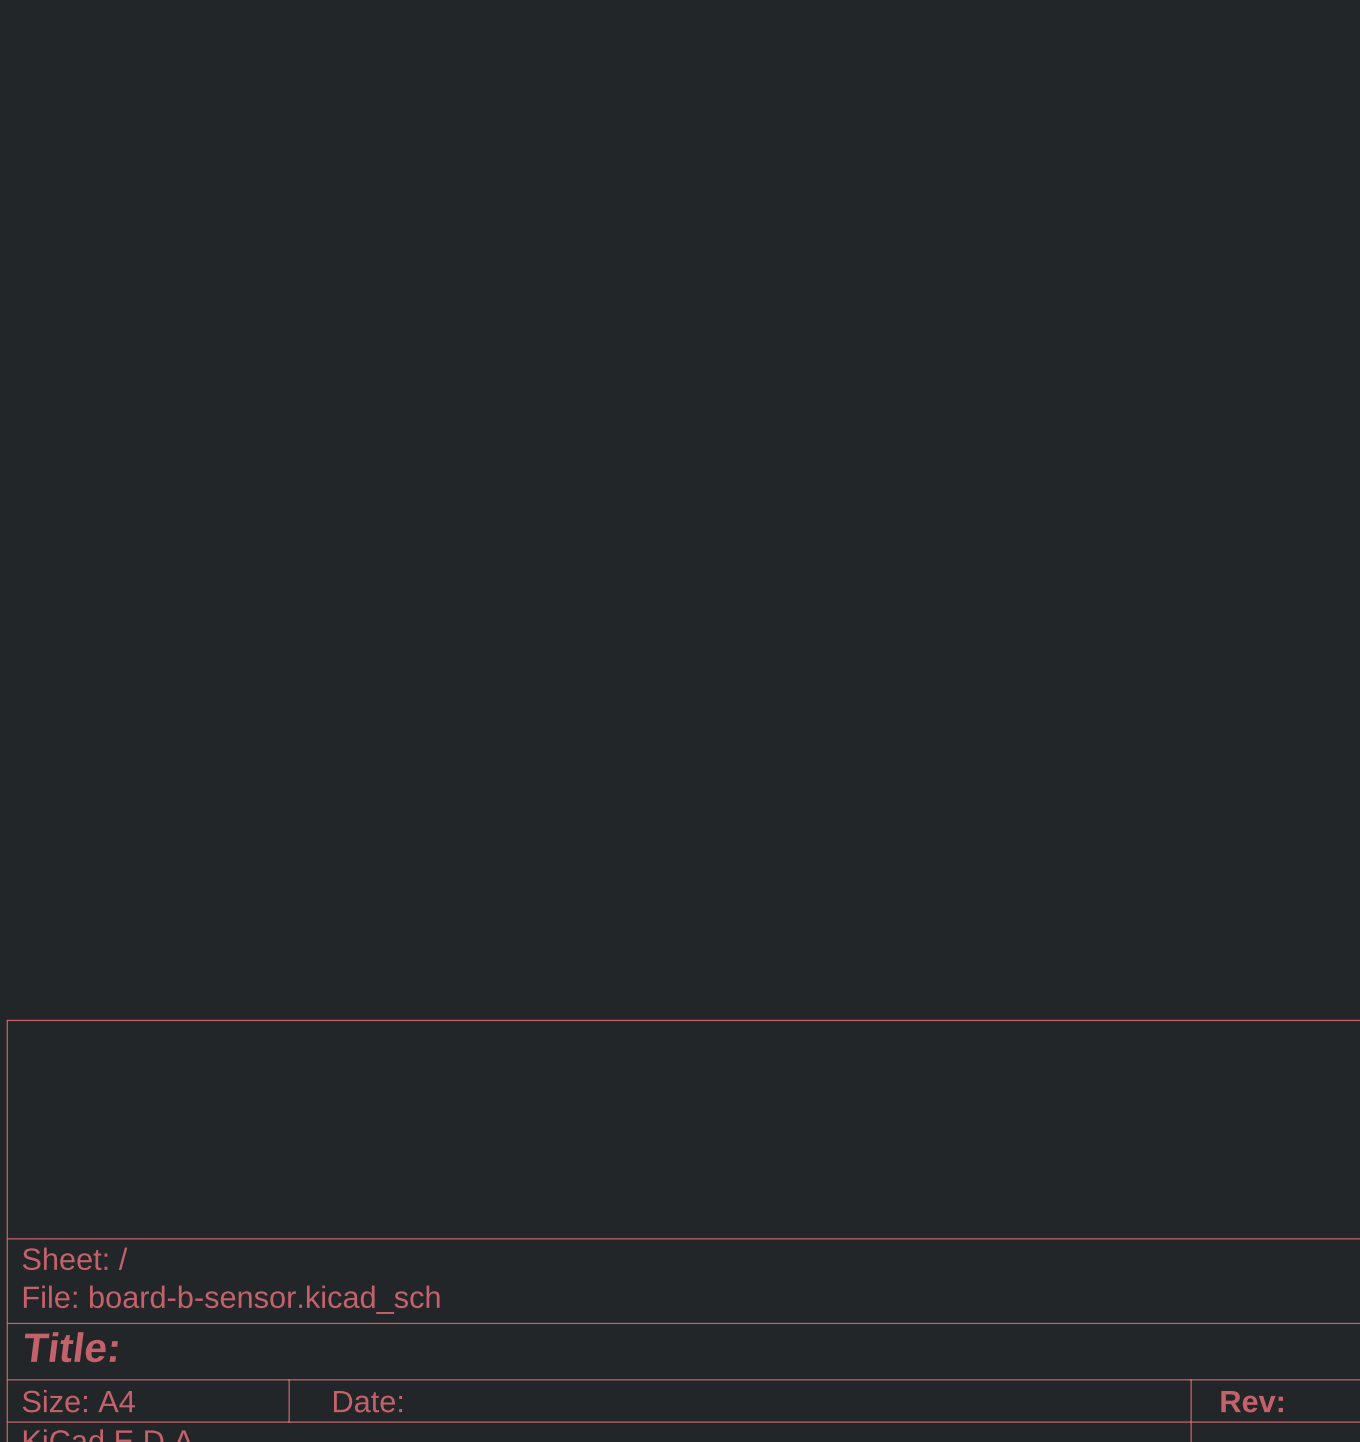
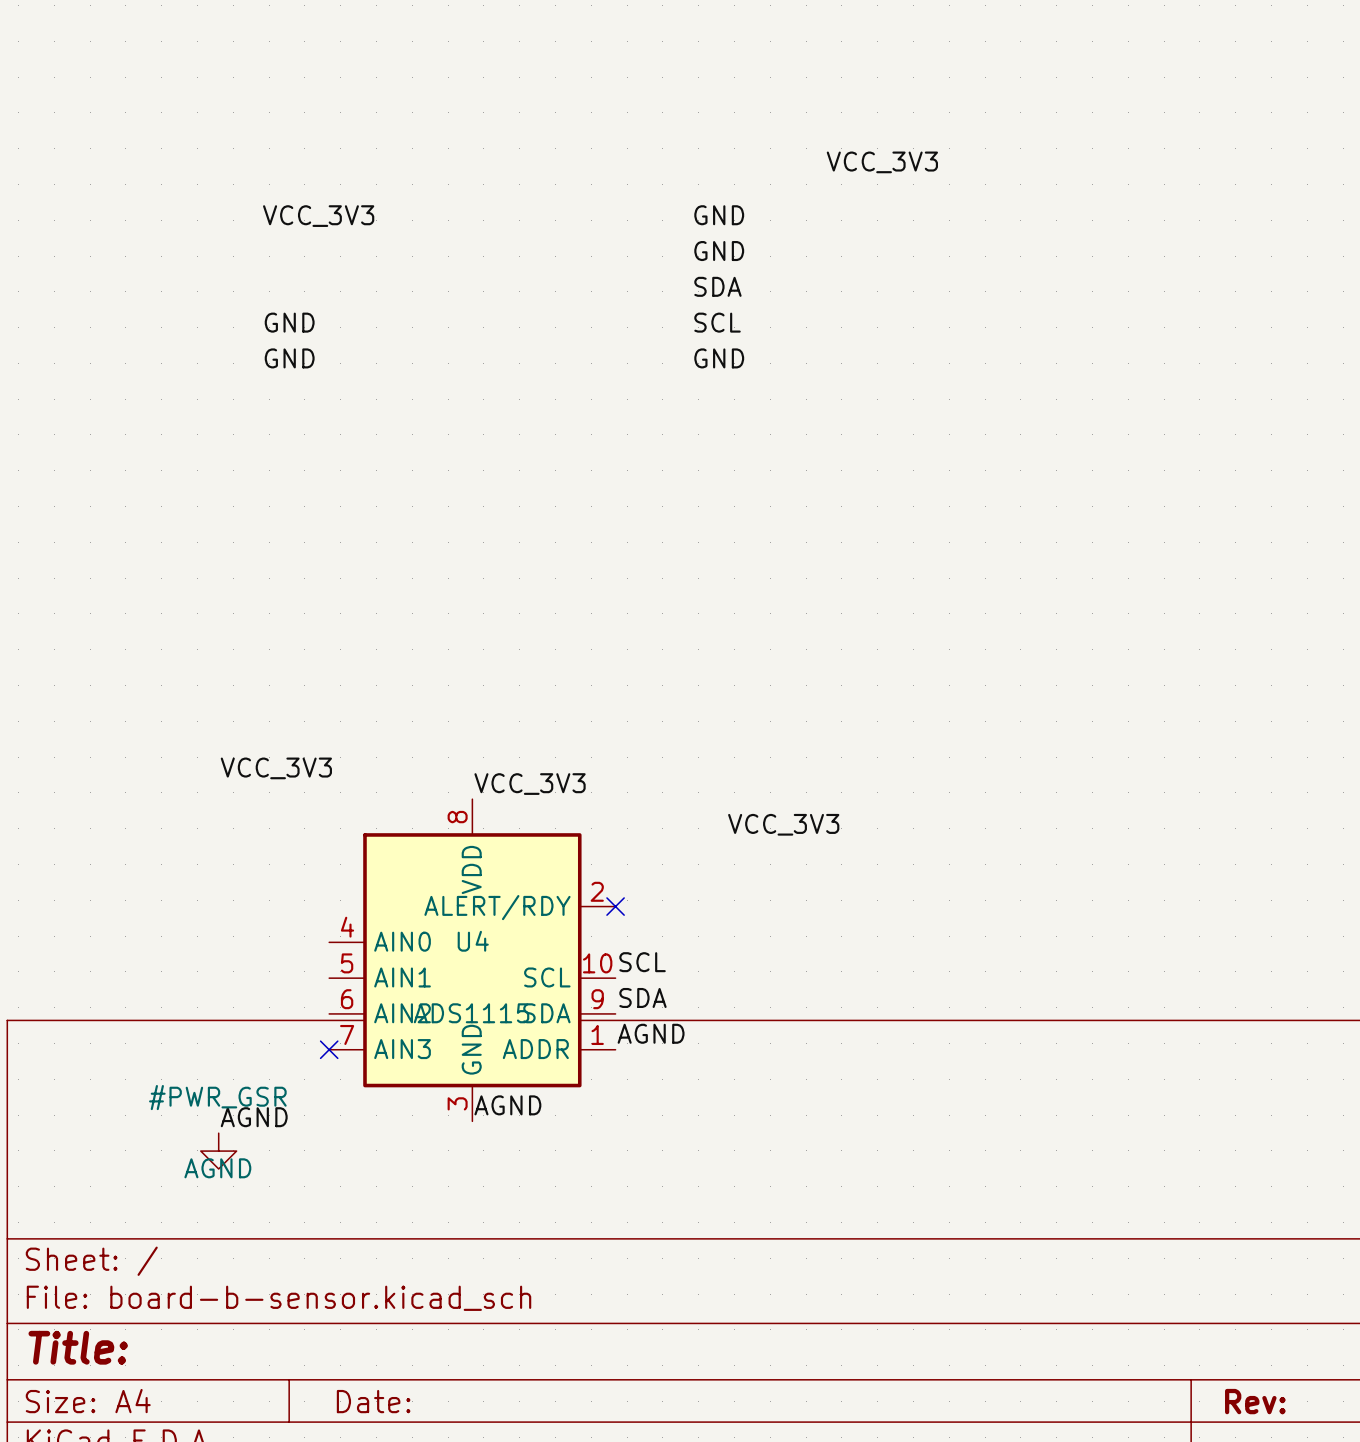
label: none -> VCC_3V3 (882, 162)
label: none -> GND (719, 215)
label: none -> VCC_3V3 (318, 216)
label: none -> GND (719, 251)
label: none -> SDA (717, 286)
label: none -> GND (289, 322)
label: none -> SCL (717, 322)
label: none -> GND (289, 358)
label: none -> GND (719, 358)
label: none -> VCC_3V3 (276, 768)
label: none -> VCC_3V3 (530, 784)
label: none -> VCC_3V3 (783, 824)
no-connect mark: none -> (615, 906)
U4: none -> ADS1115 (472, 960)
label: none -> SCL (642, 962)
label: none -> SDA (642, 997)
label: none -> AGND (651, 1033)
no-connect mark: none -> (329, 1049)
label: none -> AGND (507, 1105)
label: none -> AGND (254, 1117)
#PWR_GSR: none -> AGND (218, 1151)

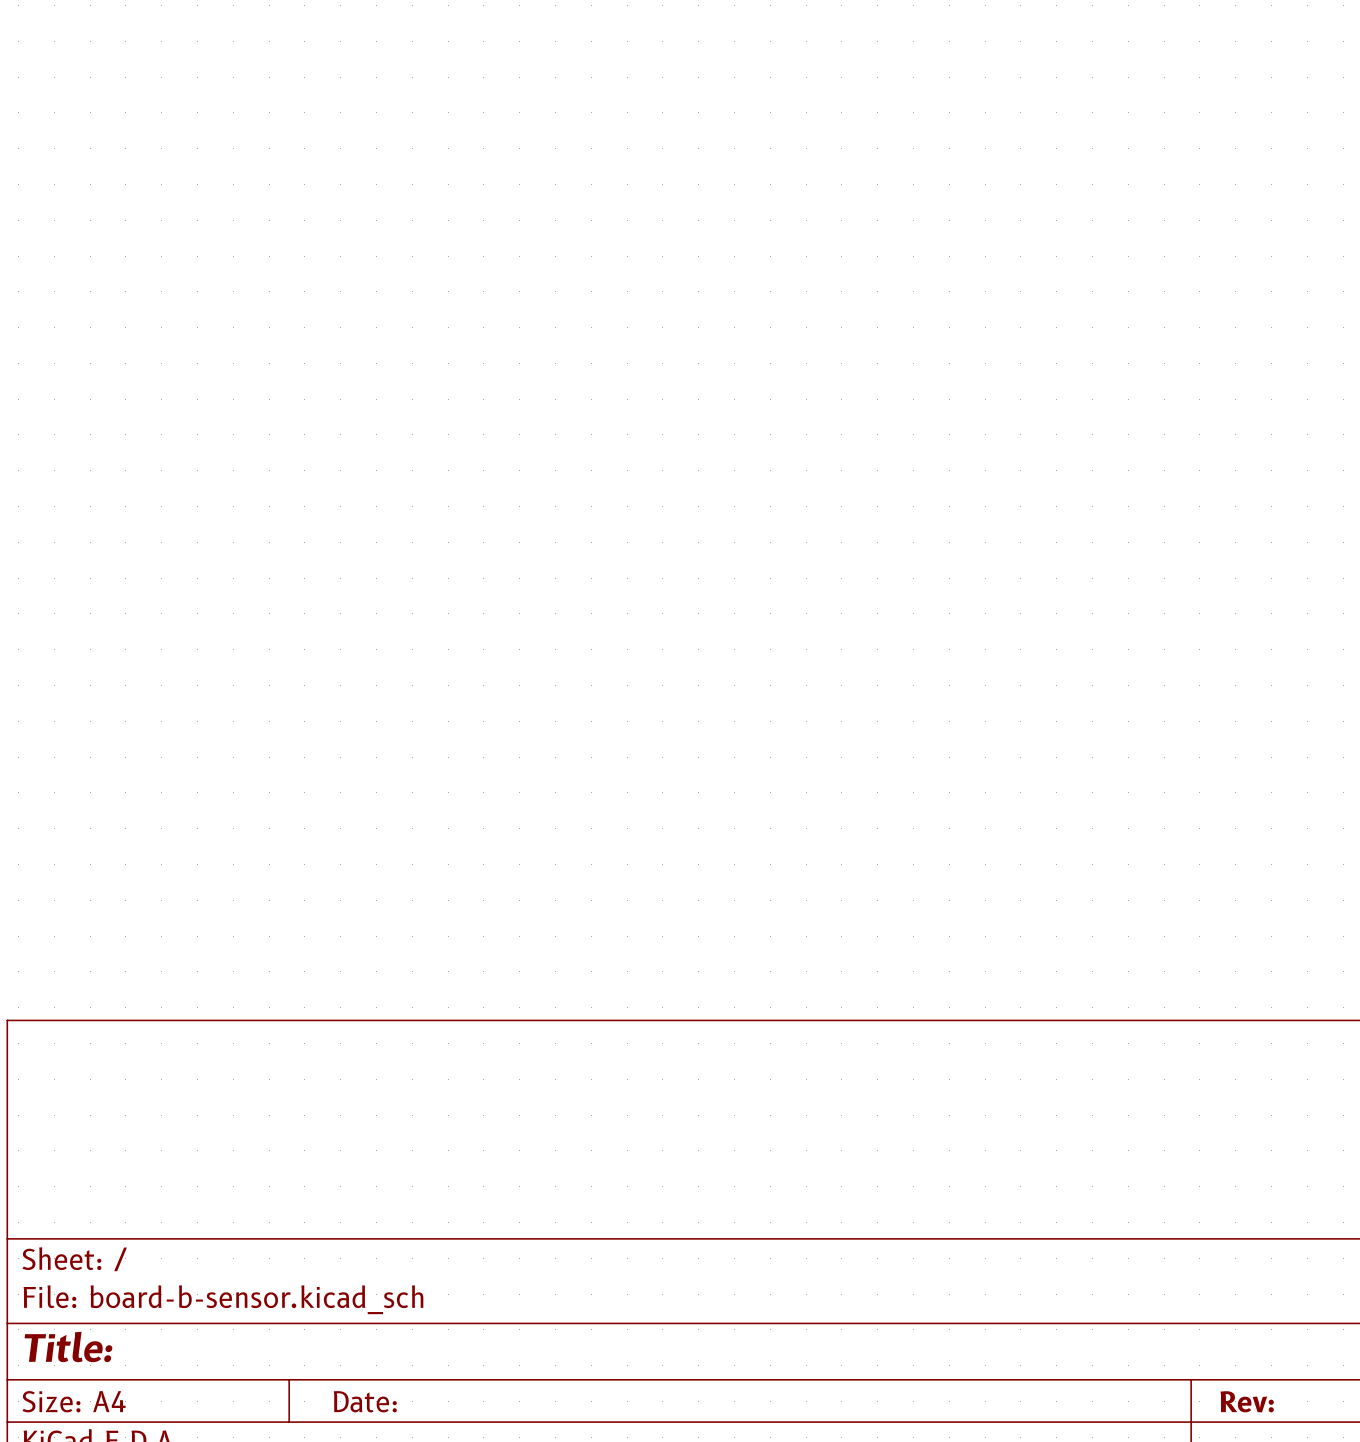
label: VCC_3V3 (882, 162) -> none
label: GND (719, 215) -> none
label: VCC_3V3 (318, 216) -> none
label: GND (719, 251) -> none
label: SDA (717, 286) -> none
label: GND (289, 322) -> none
label: SCL (717, 322) -> none
label: GND (289, 358) -> none
label: GND (719, 358) -> none
label: VCC_3V3 (276, 768) -> none
label: VCC_3V3 (530, 784) -> none
label: VCC_3V3 (783, 824) -> none
no-connect mark: (615, 906) -> none
U4: ADS1115 (472, 960) -> none
label: SCL (642, 962) -> none
label: SDA (642, 997) -> none
label: AGND (651, 1033) -> none
no-connect mark: (329, 1049) -> none
label: AGND (507, 1105) -> none
label: AGND (254, 1117) -> none
#PWR_GSR: AGND (218, 1151) -> none

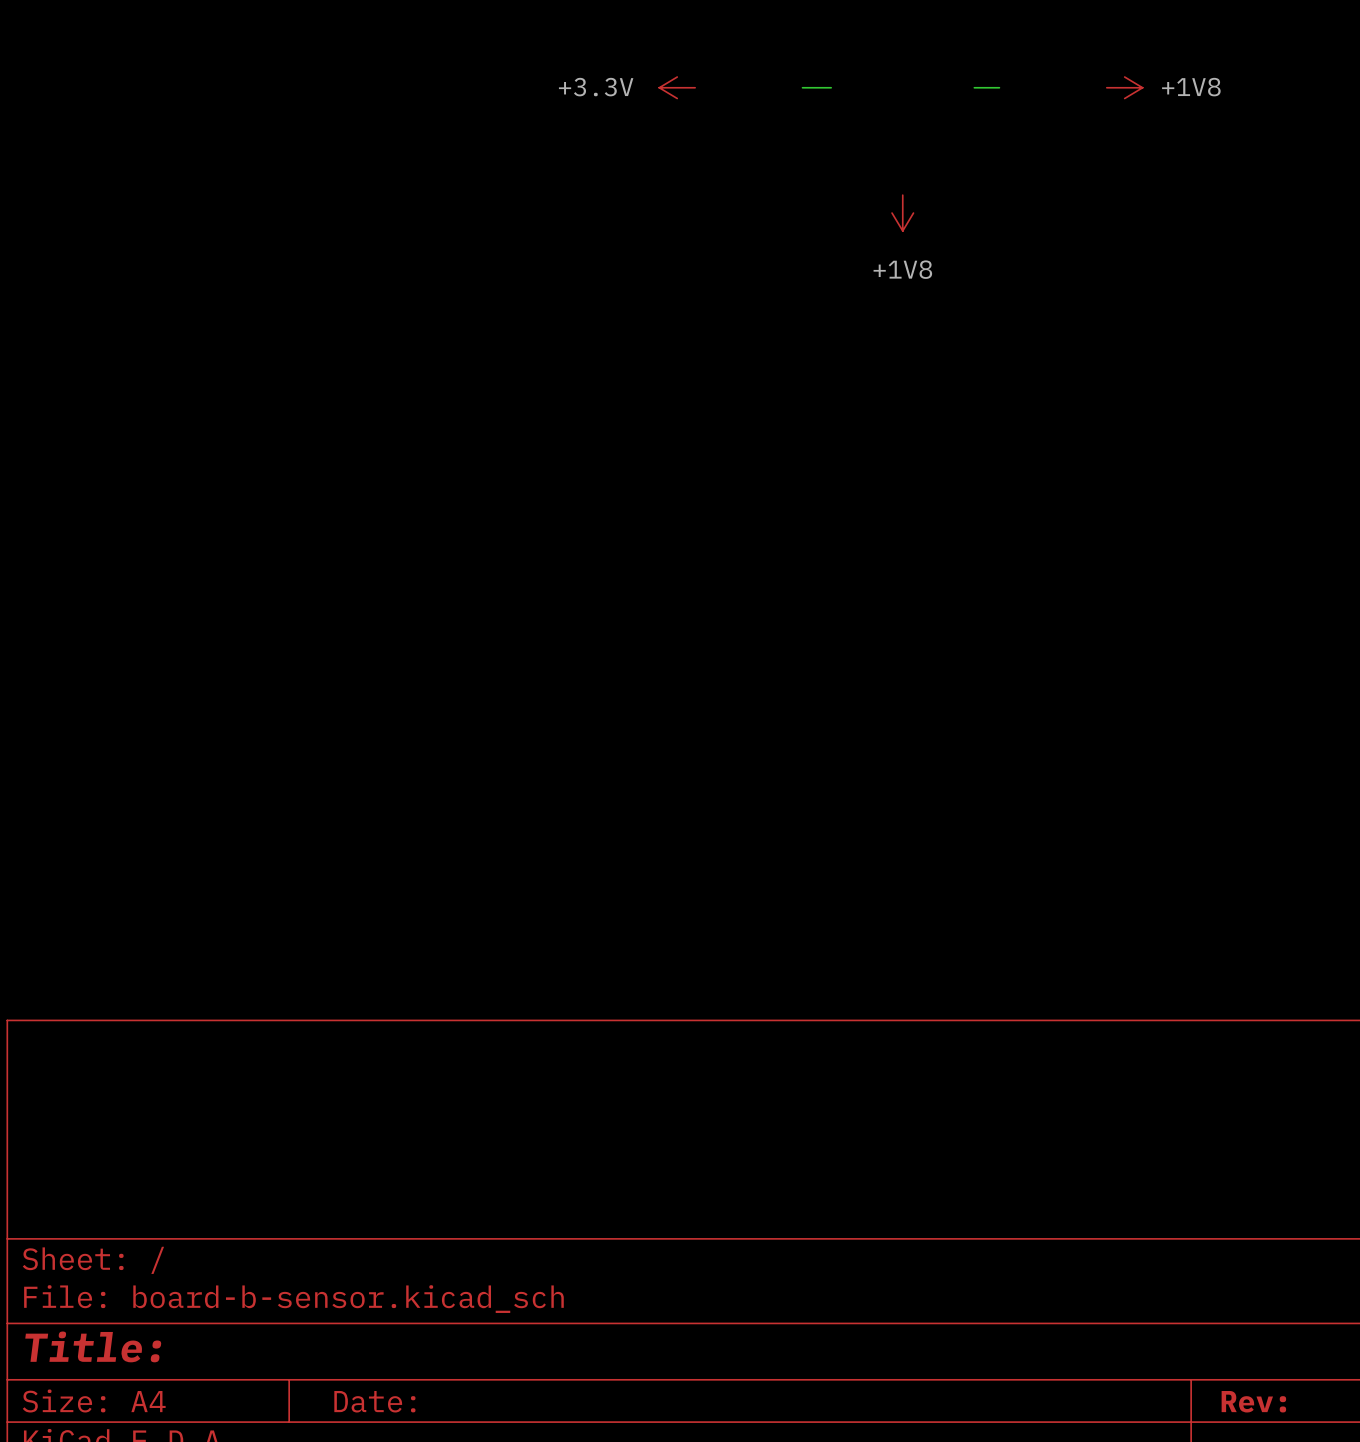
power symbol: none -> +3.3V (677, 87)
wire: none -> (802, 87) (831, 87)
wire: none -> (974, 87) (999, 87)
power symbol: none -> +1V8 (1124, 87)
power symbol: none -> +1V8 (902, 213)

